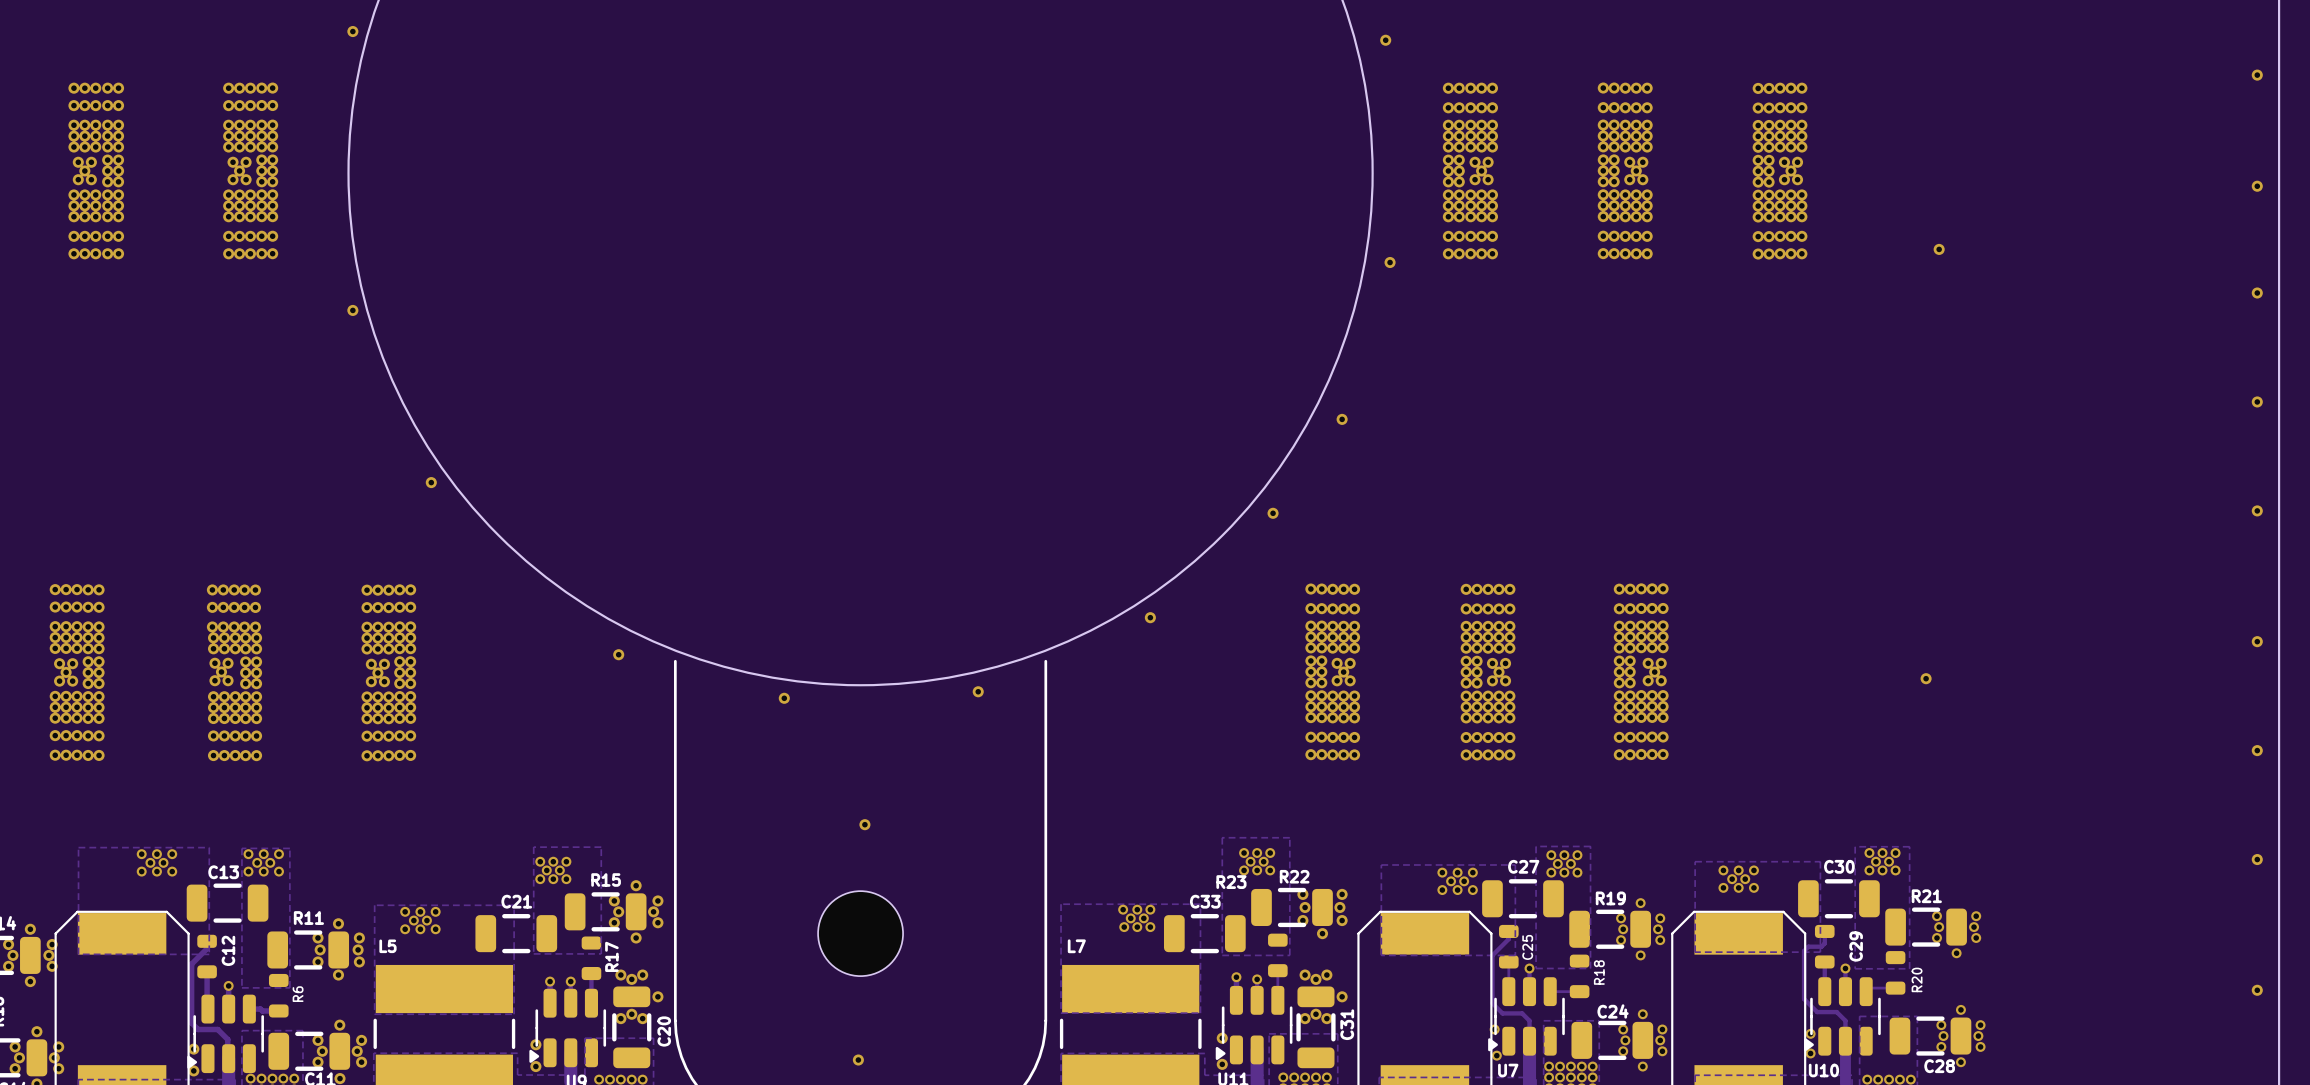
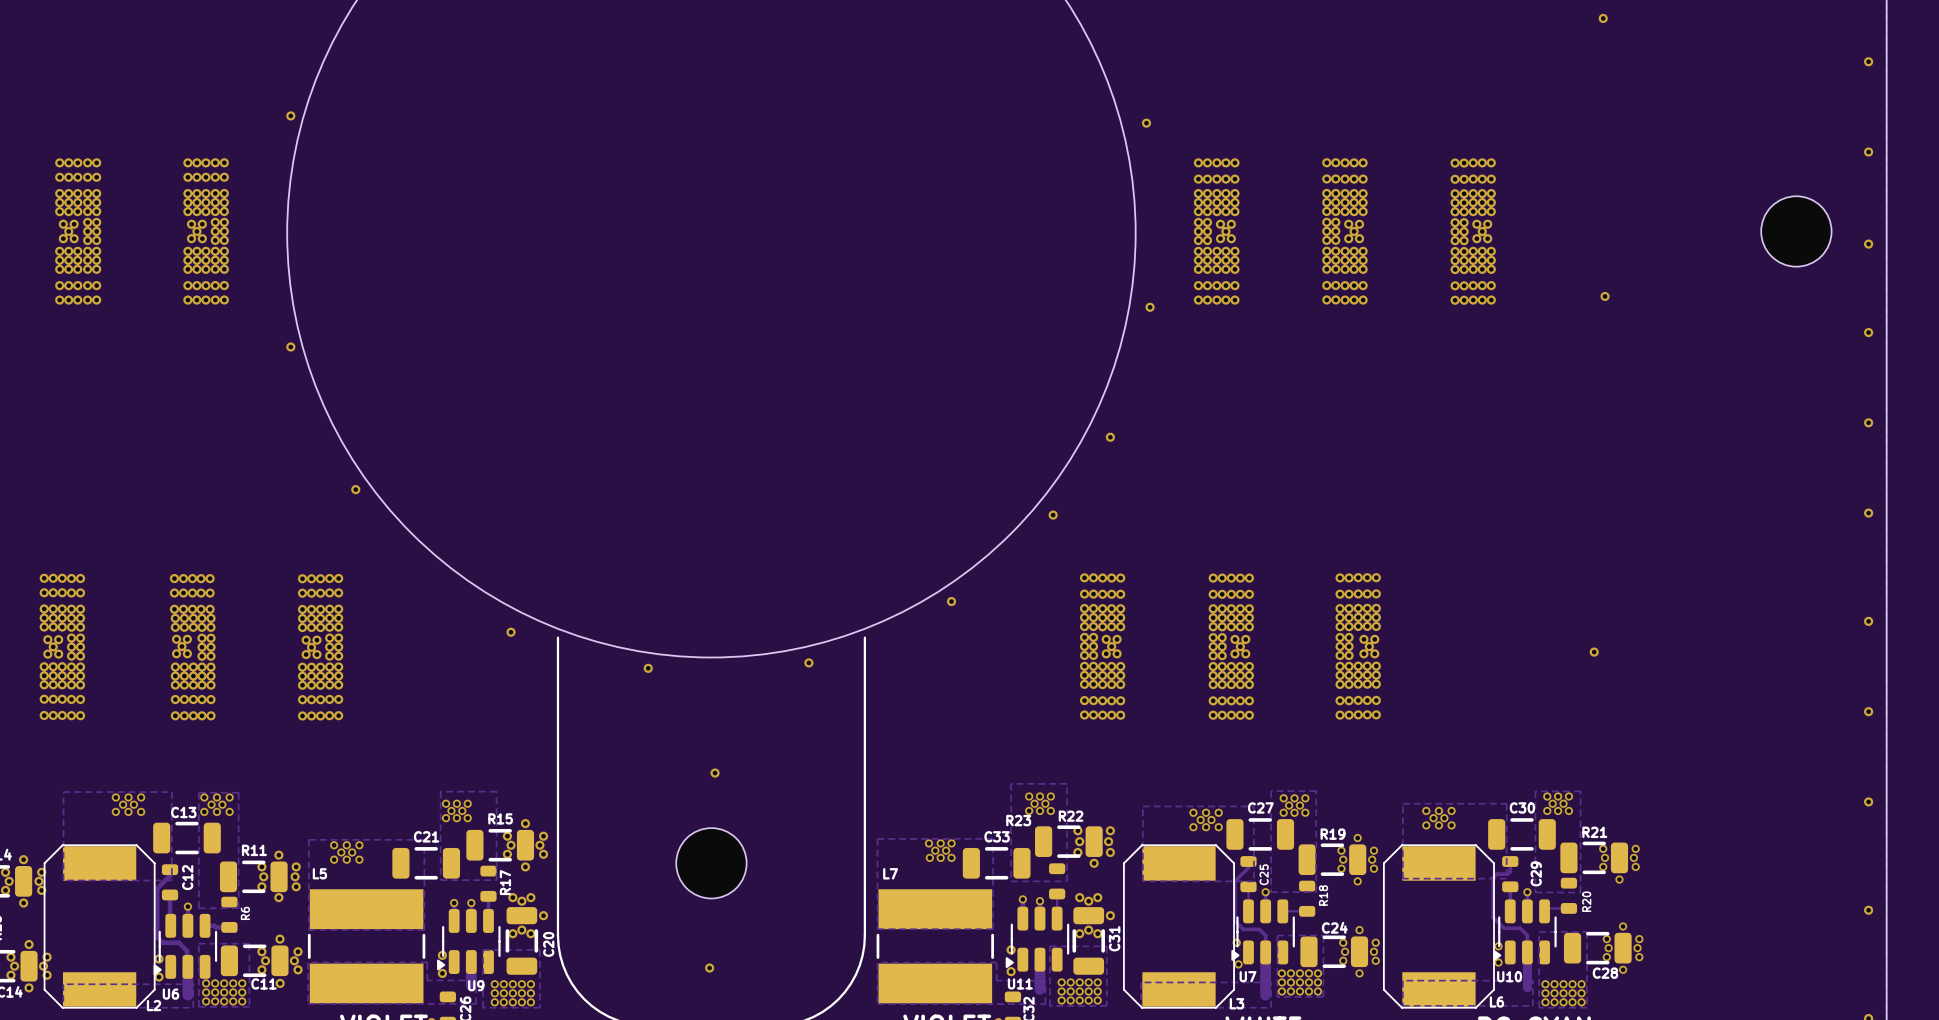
part: none -> (1796, 231)

